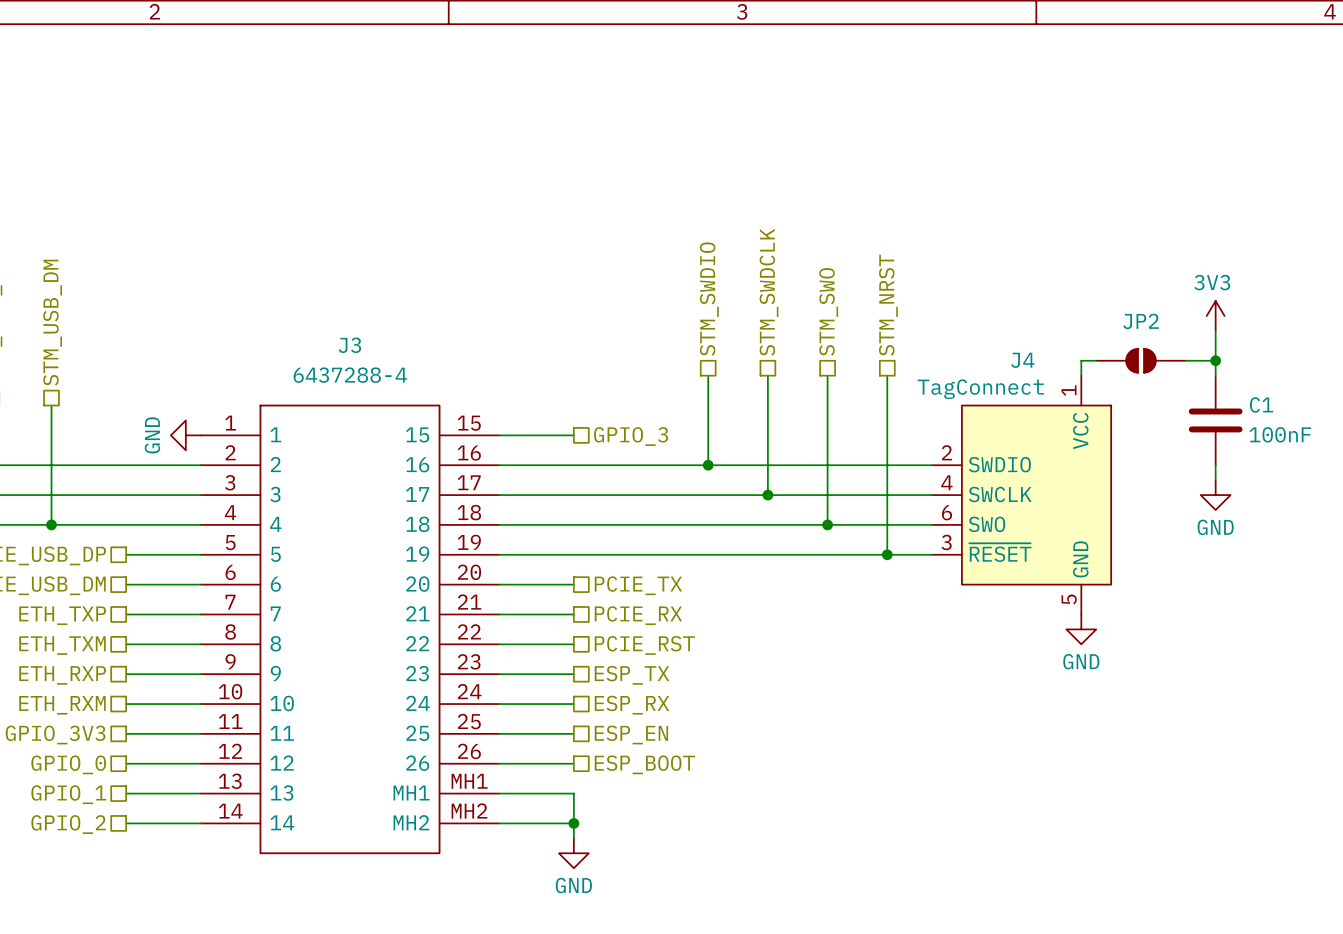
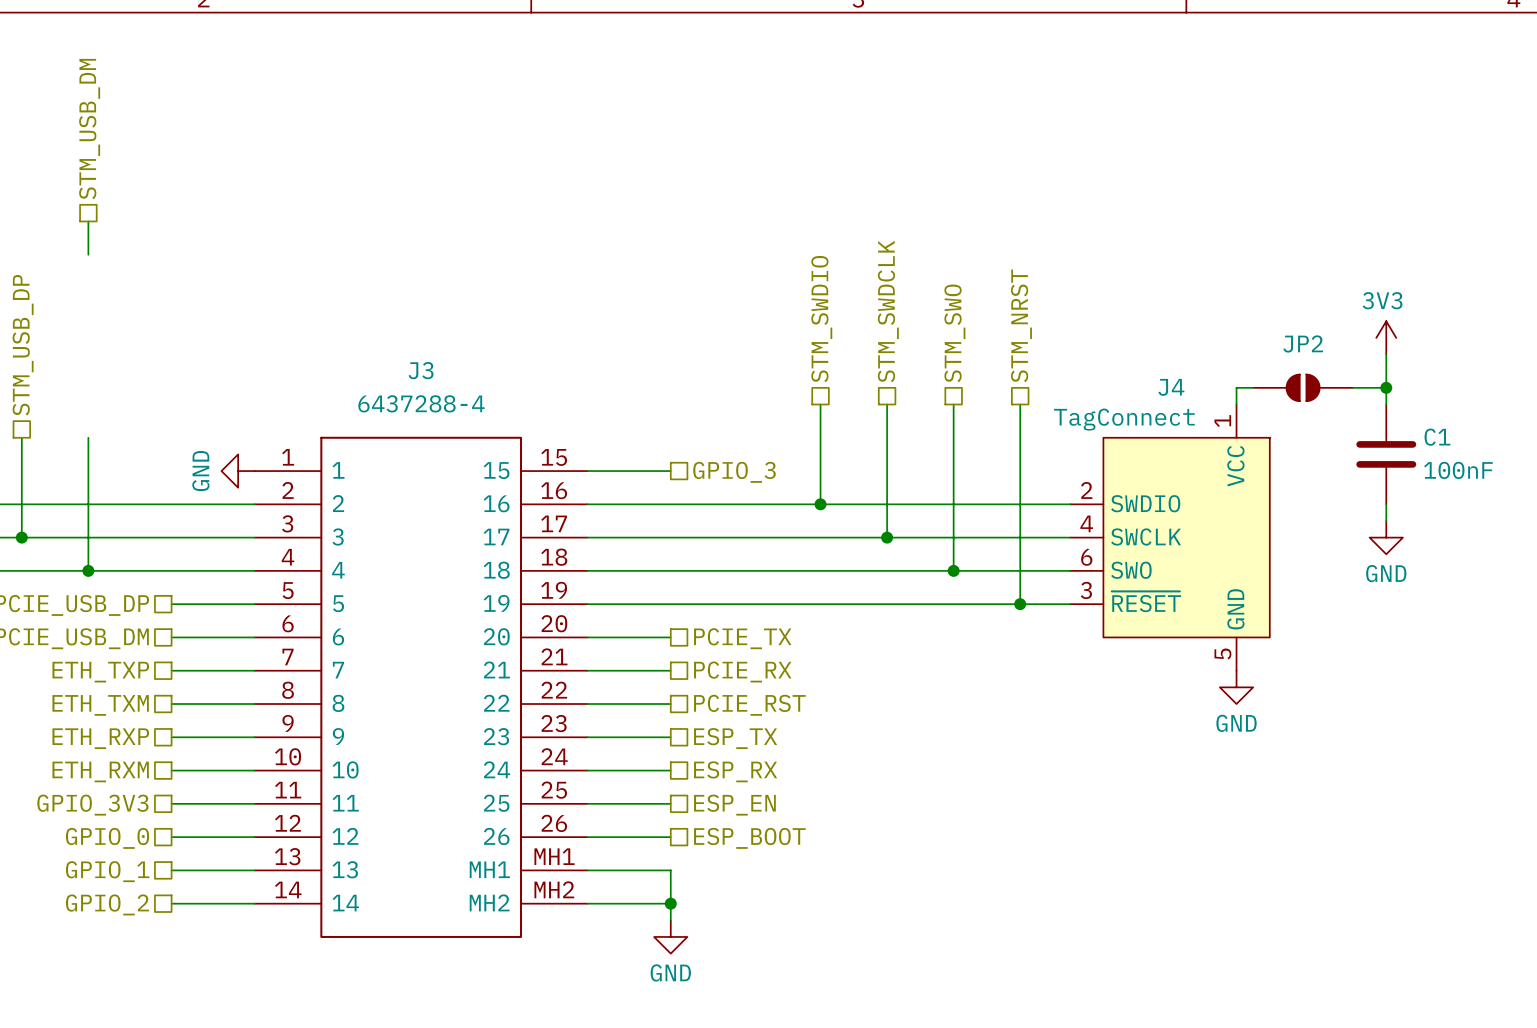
wire: none -> (88, 221) (88, 254)
hierarchical label position: STM_USB_DM (52, 322) -> STM_USB_DM (89, 129)

